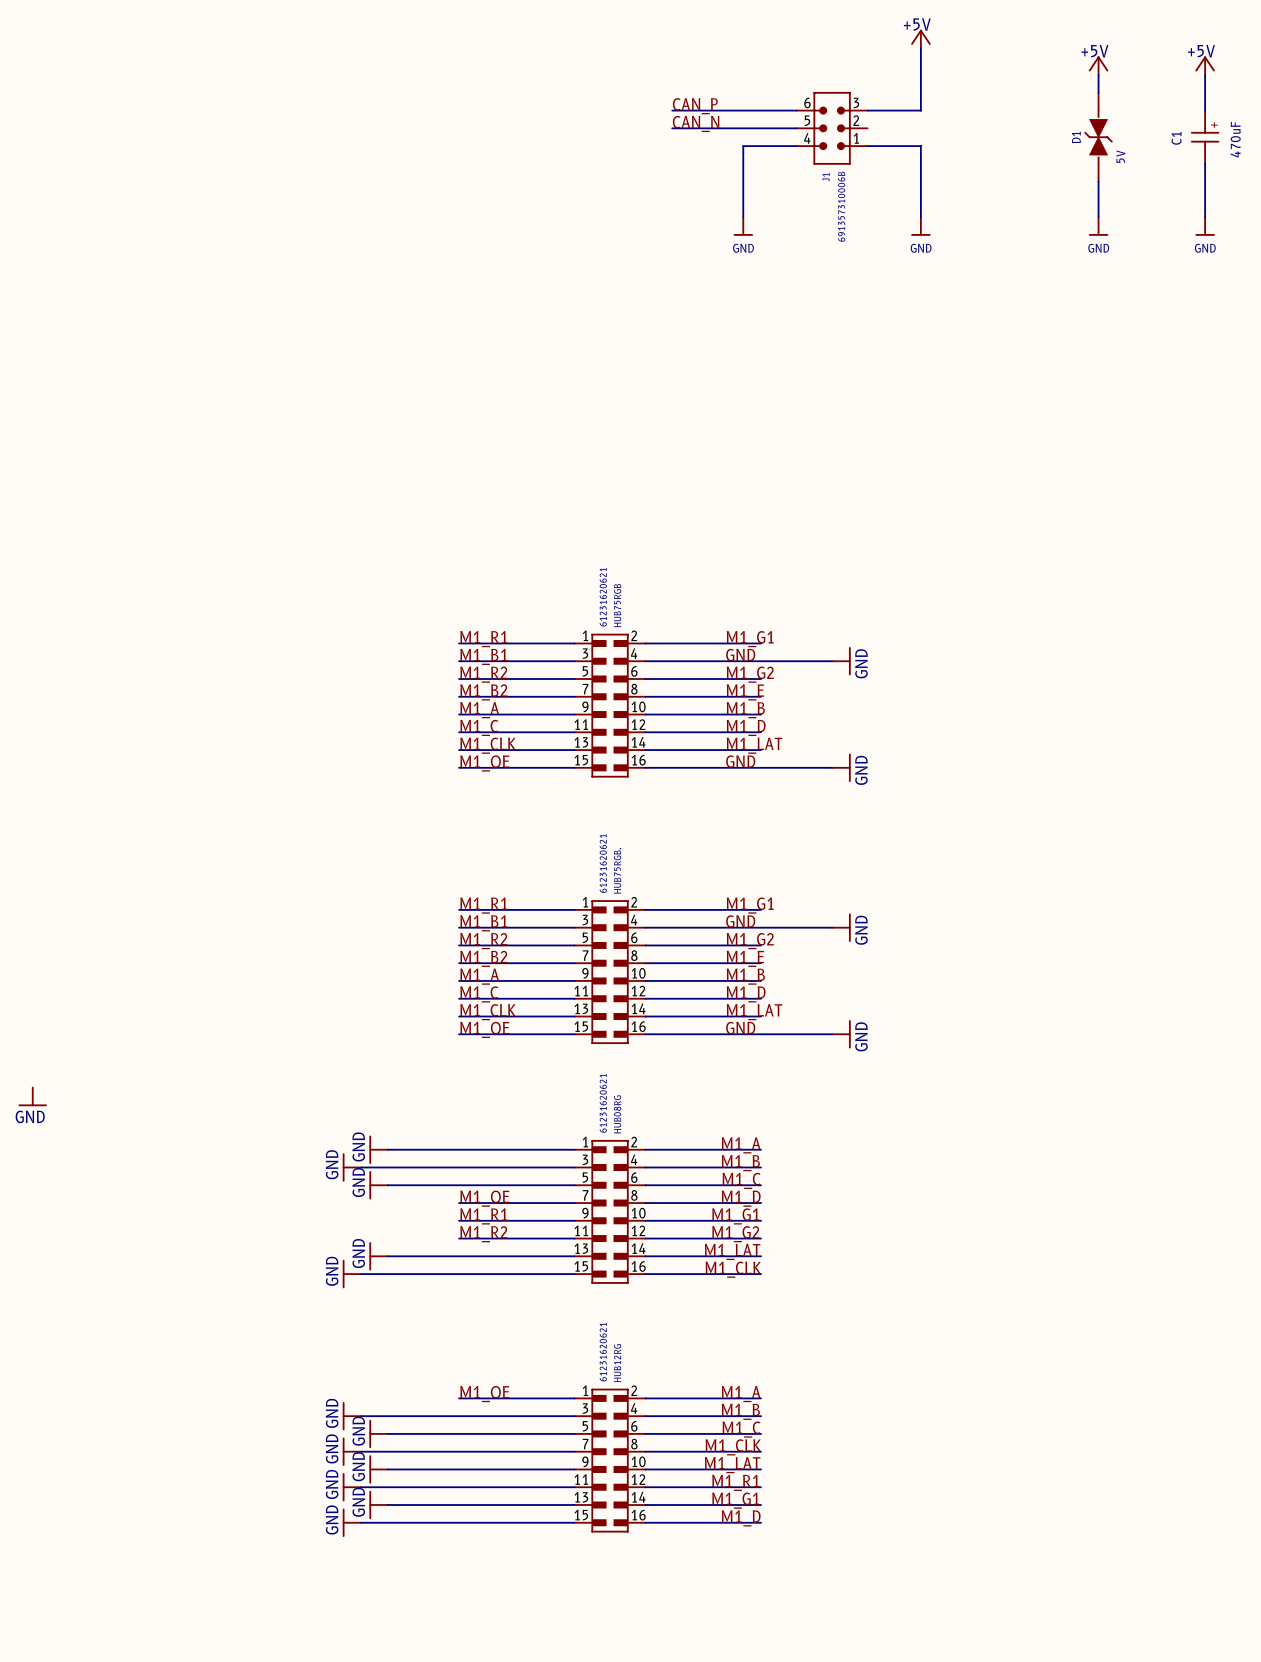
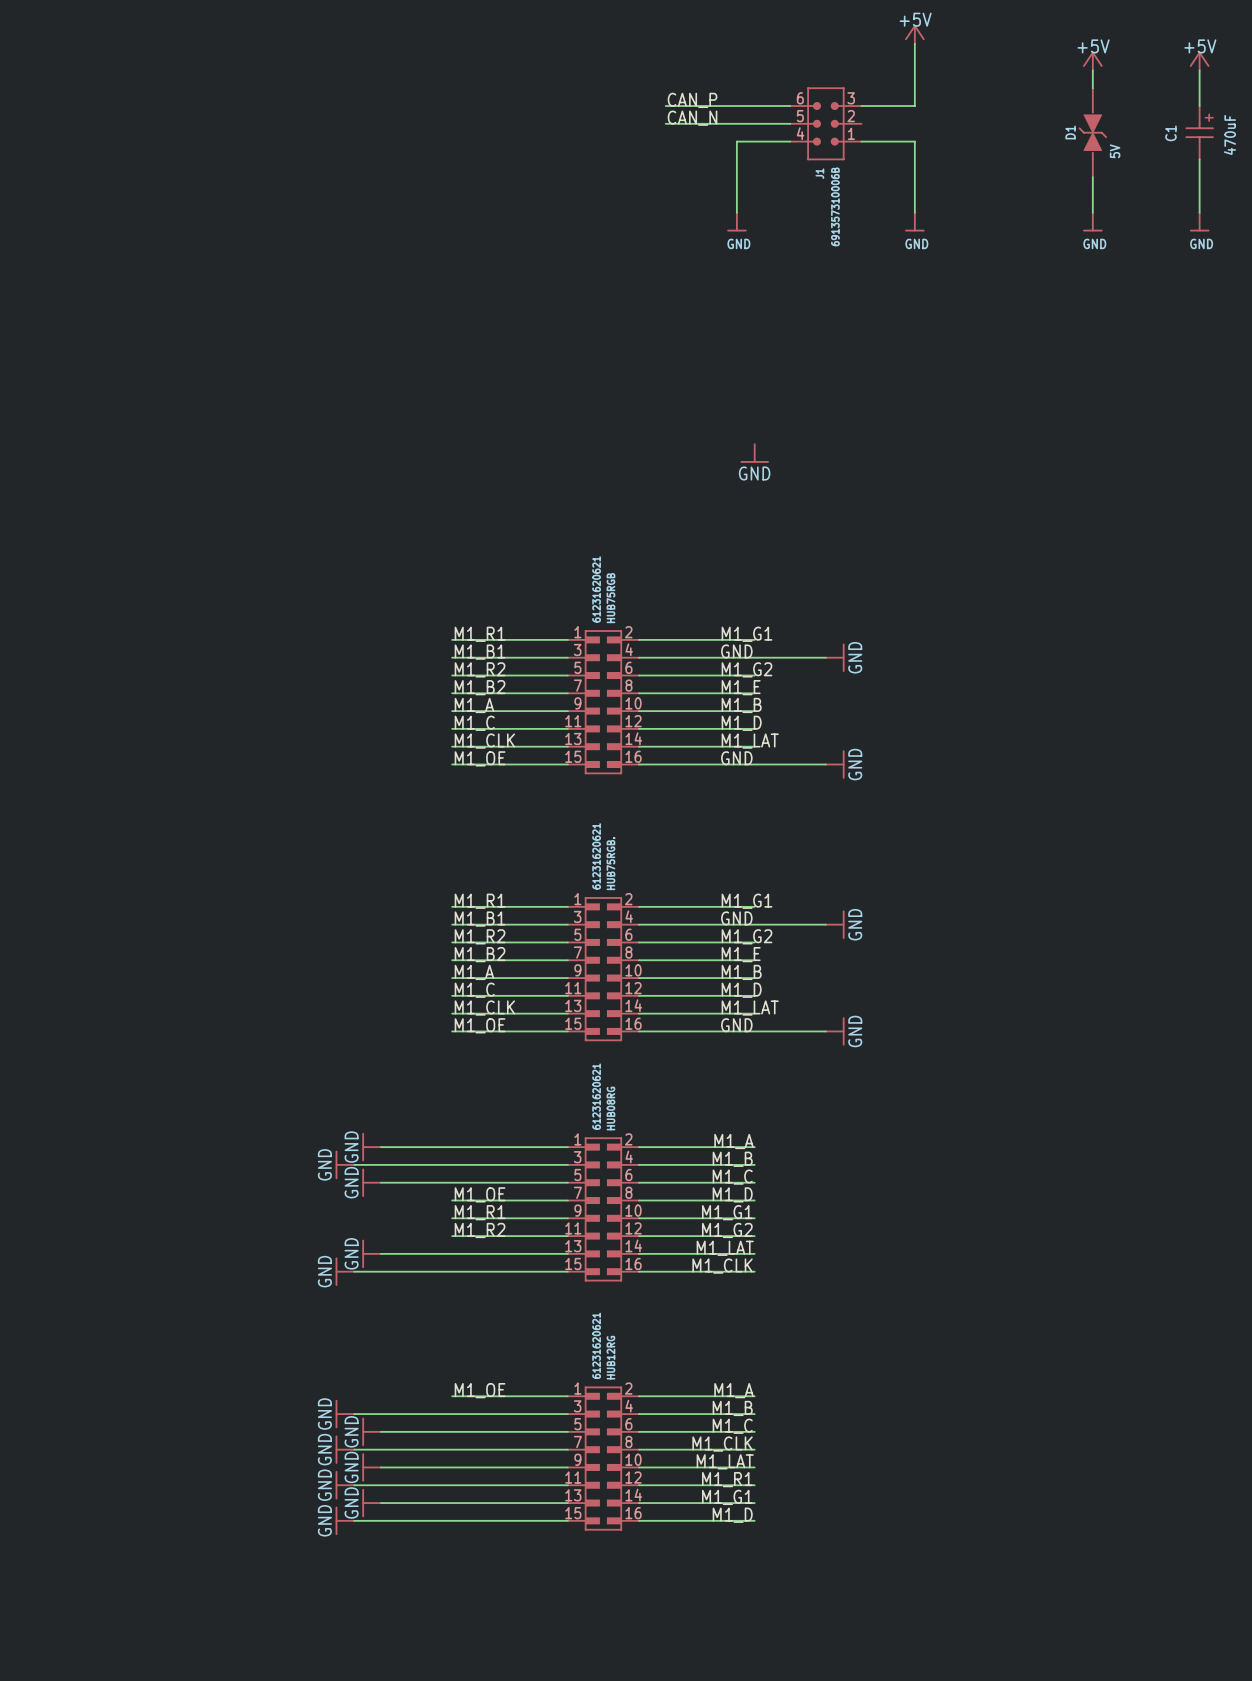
power symbol: none -> GND (754, 453)
power symbol: GND (32, 1096) -> none

